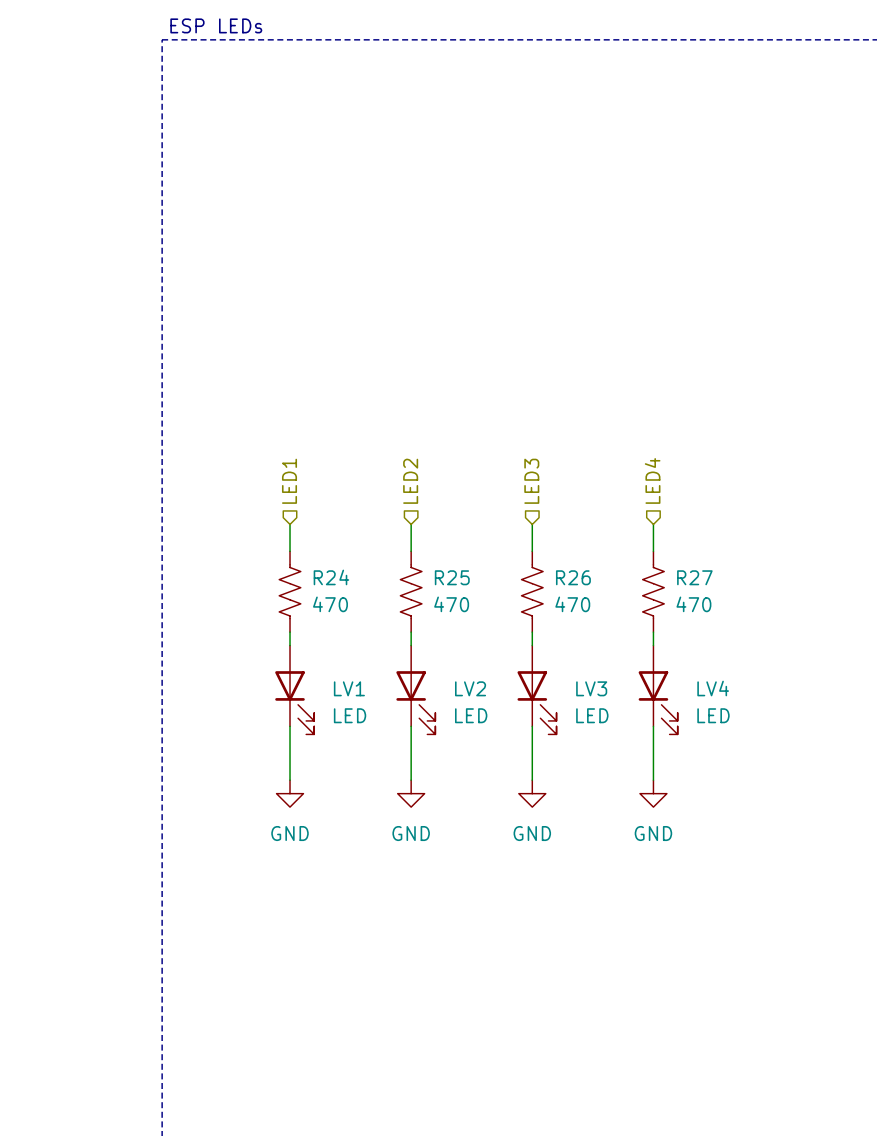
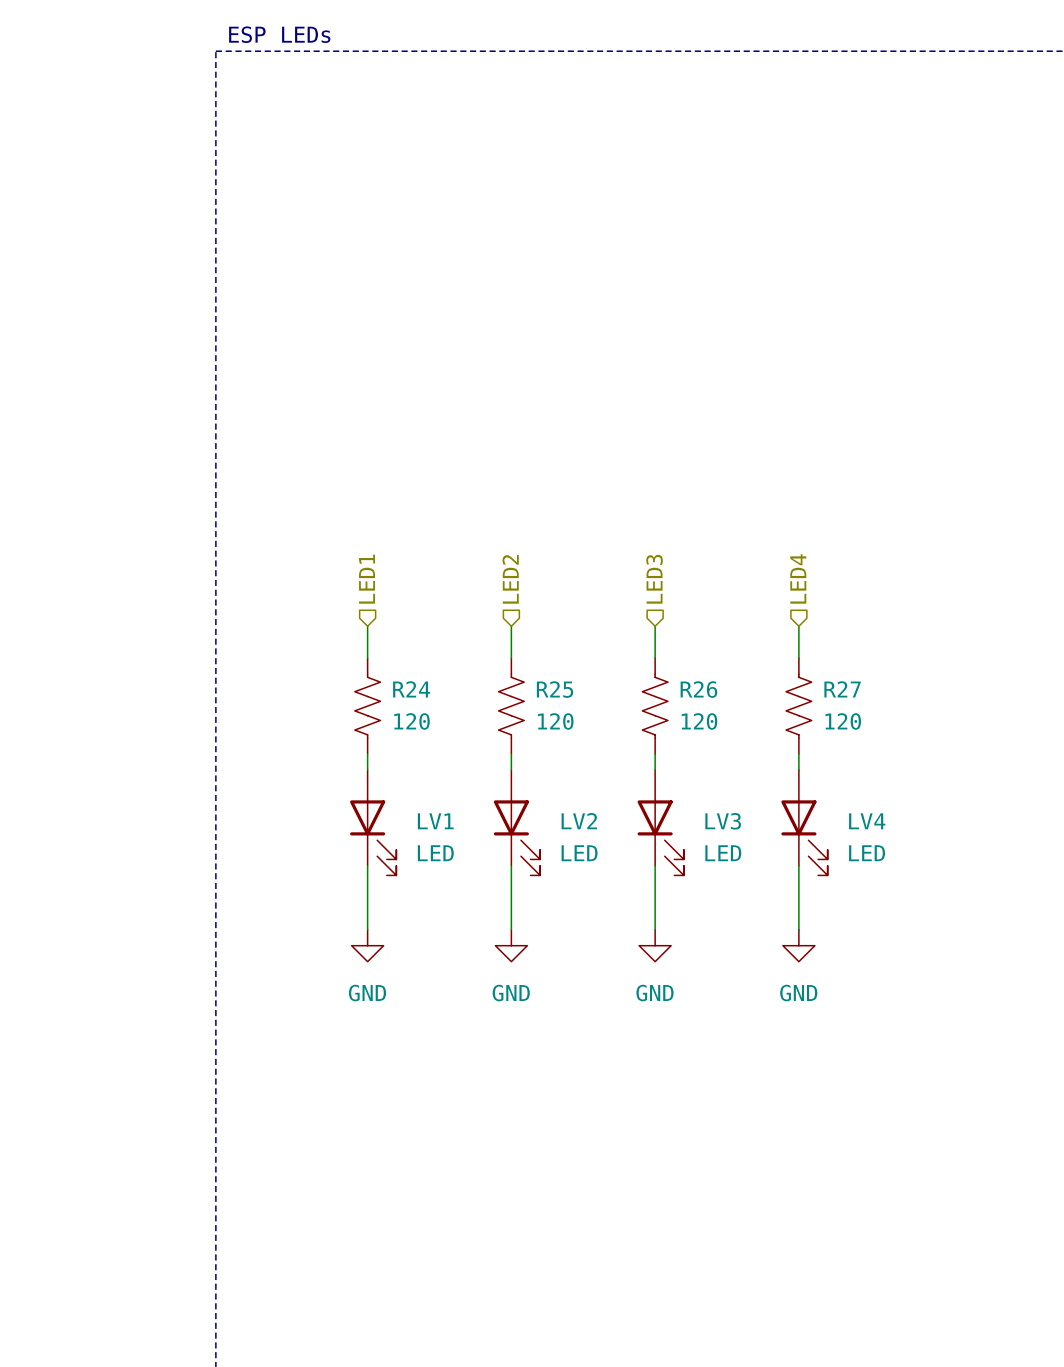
R24 value: 470 (330, 604) -> 120 (411, 721)
R25 value: 470 (451, 604) -> 120 (555, 721)
R26 value: 470 (572, 604) -> 120 (699, 721)
R27 value: 470 (693, 604) -> 120 (843, 721)

